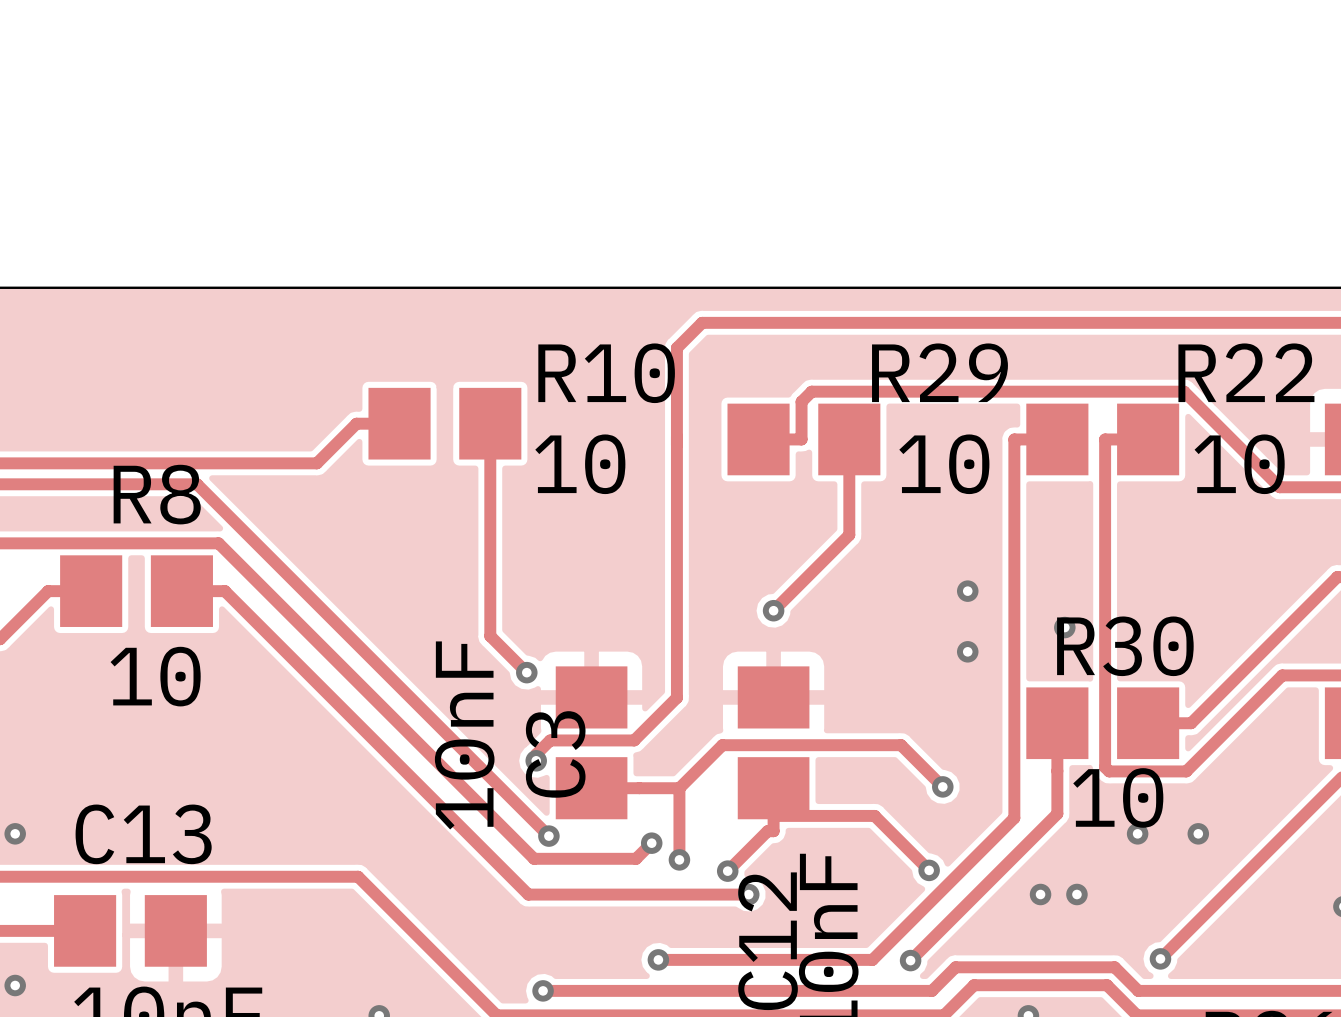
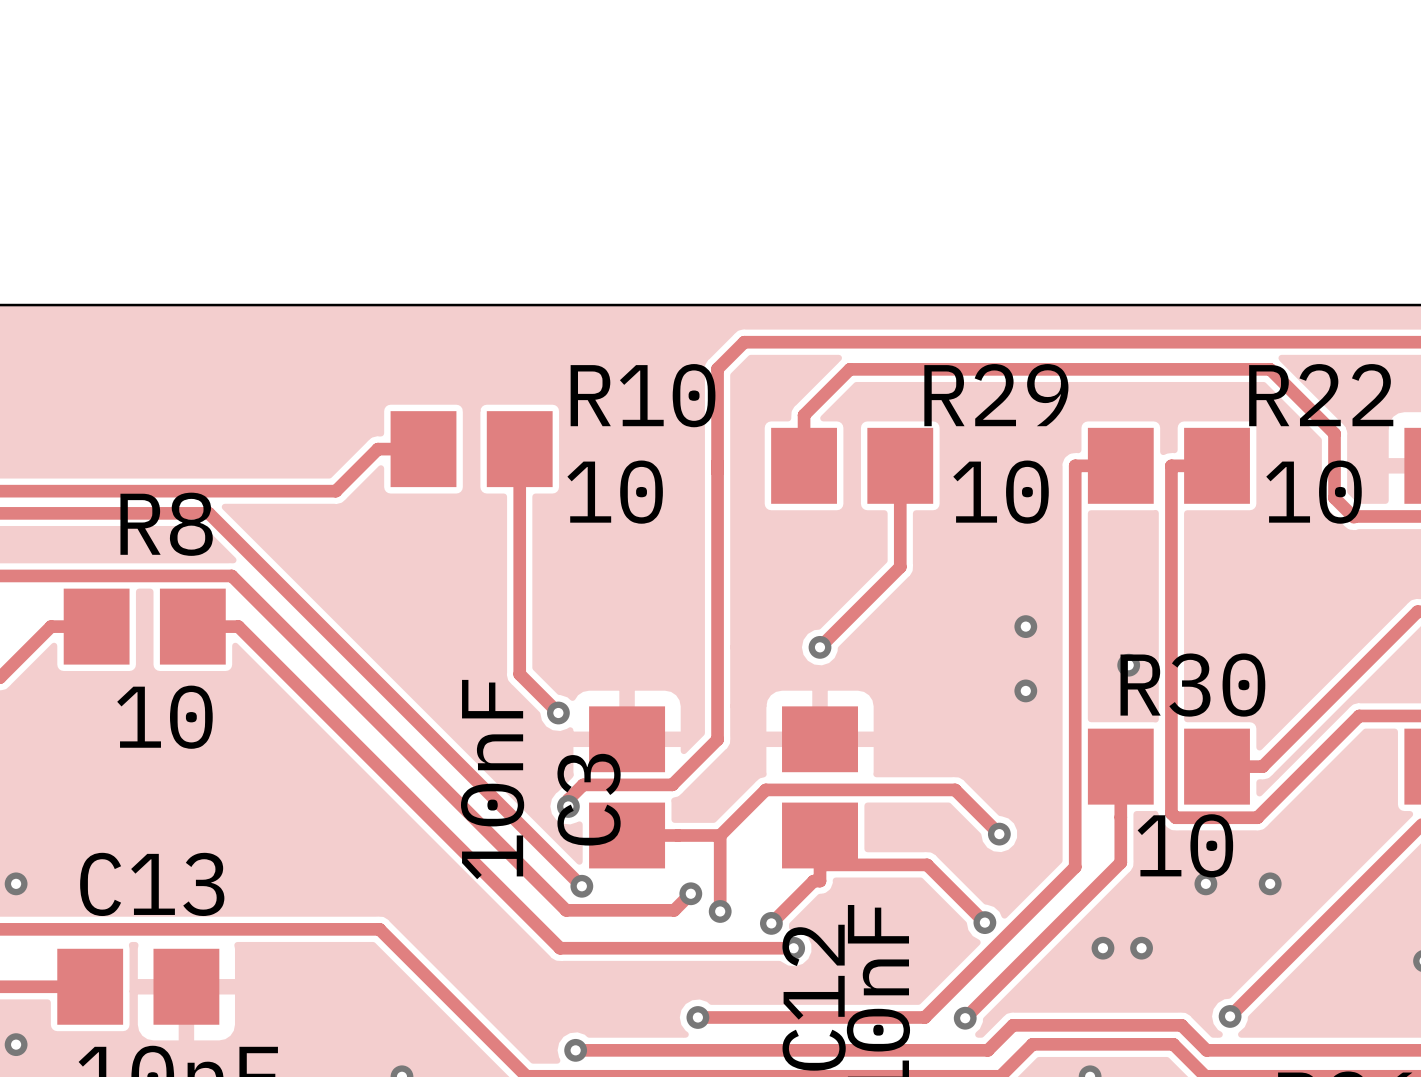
track: (758, 439) (801, 439) (801, 401) (811, 391) (1184, 391) (1279, 487) -> (804, 465) (804, 415) (849, 369) (1270, 369) (1334, 433) (1334, 497) (1353, 517)

